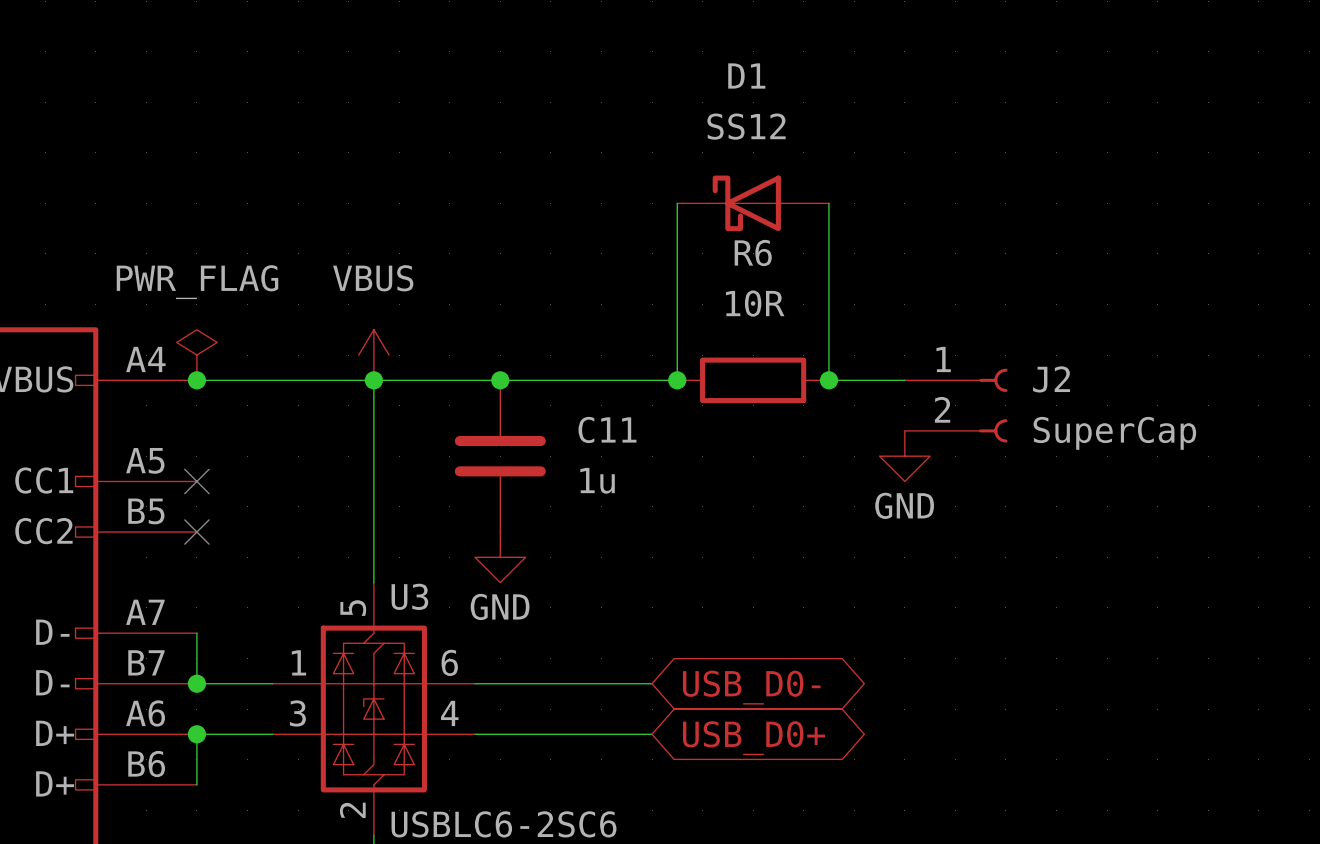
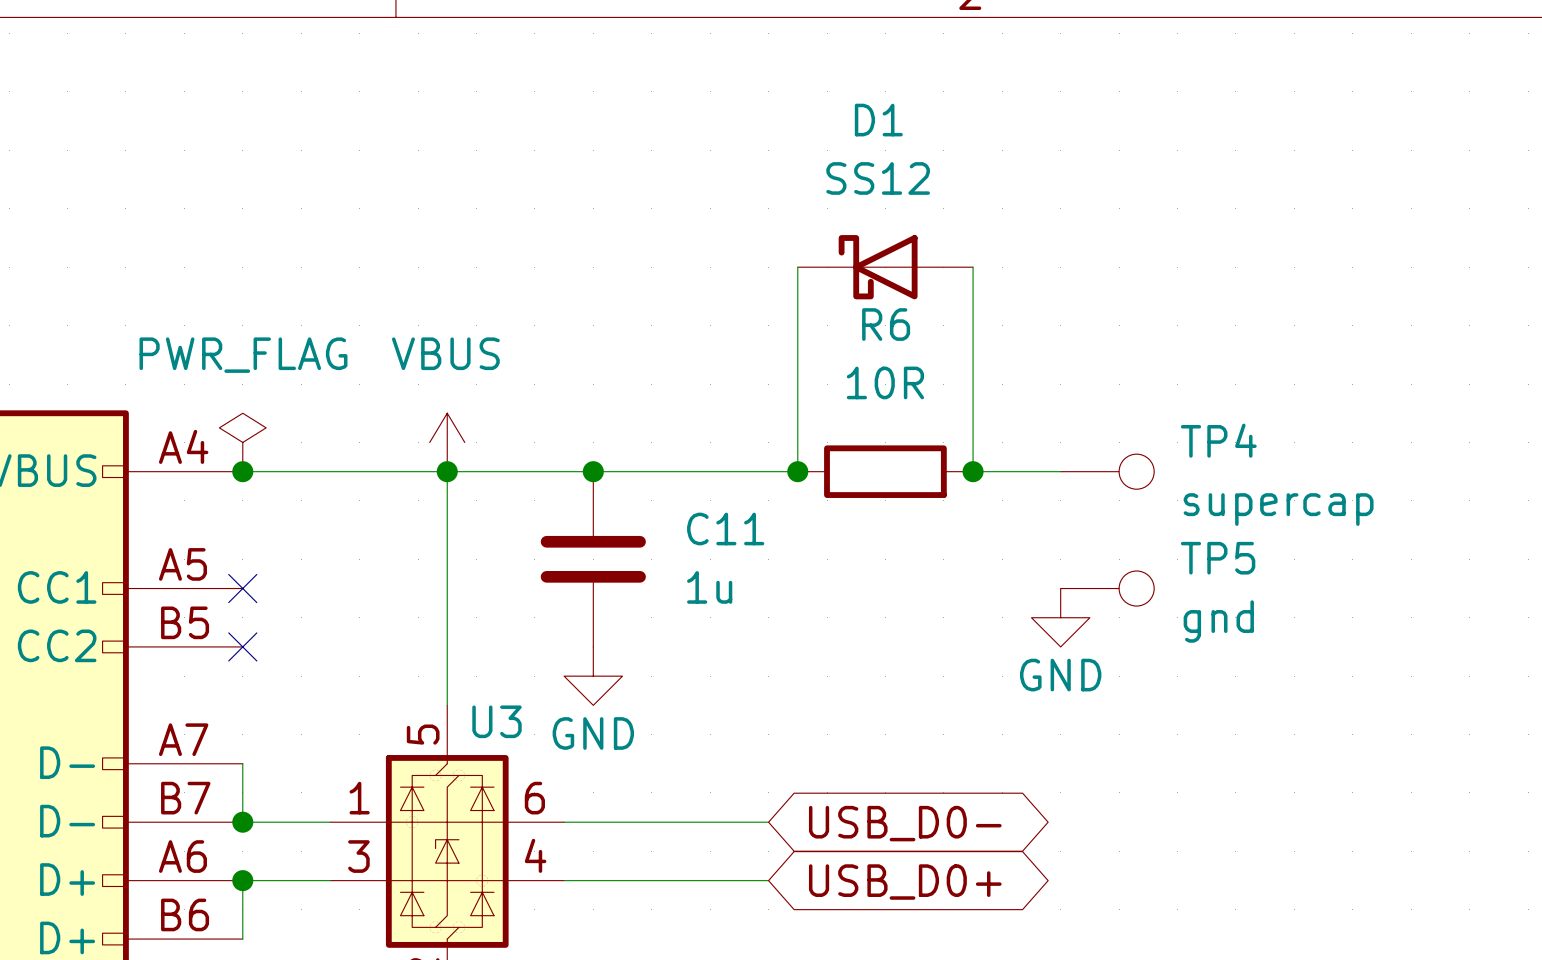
TP4: none -> supercap (1107, 471)
J2: SuperCap (956, 405) -> none
power symbol position: GND (904, 456) -> GND (1060, 617)
TP5: none -> gnd (1107, 588)

